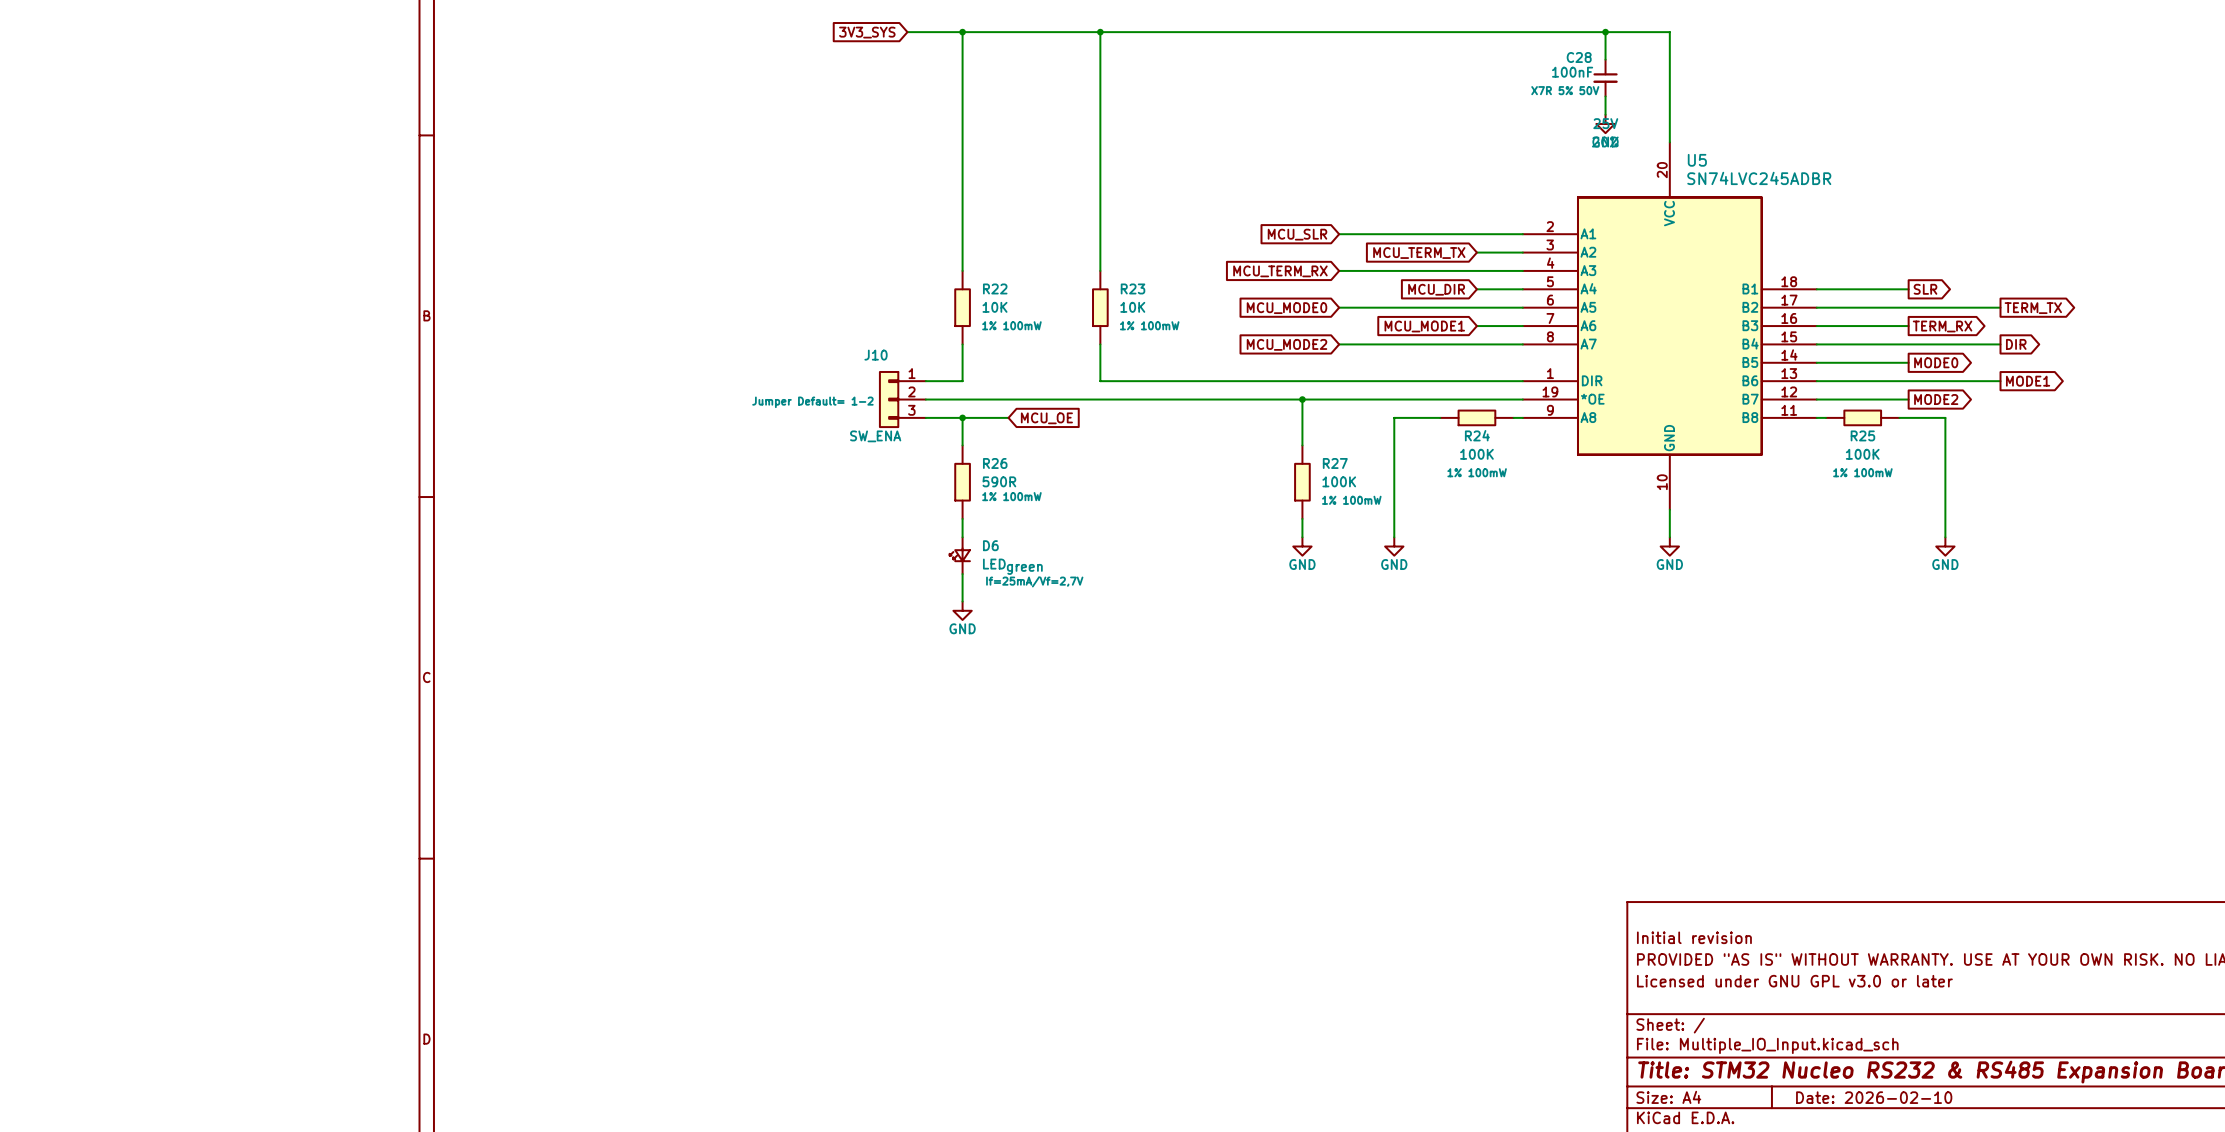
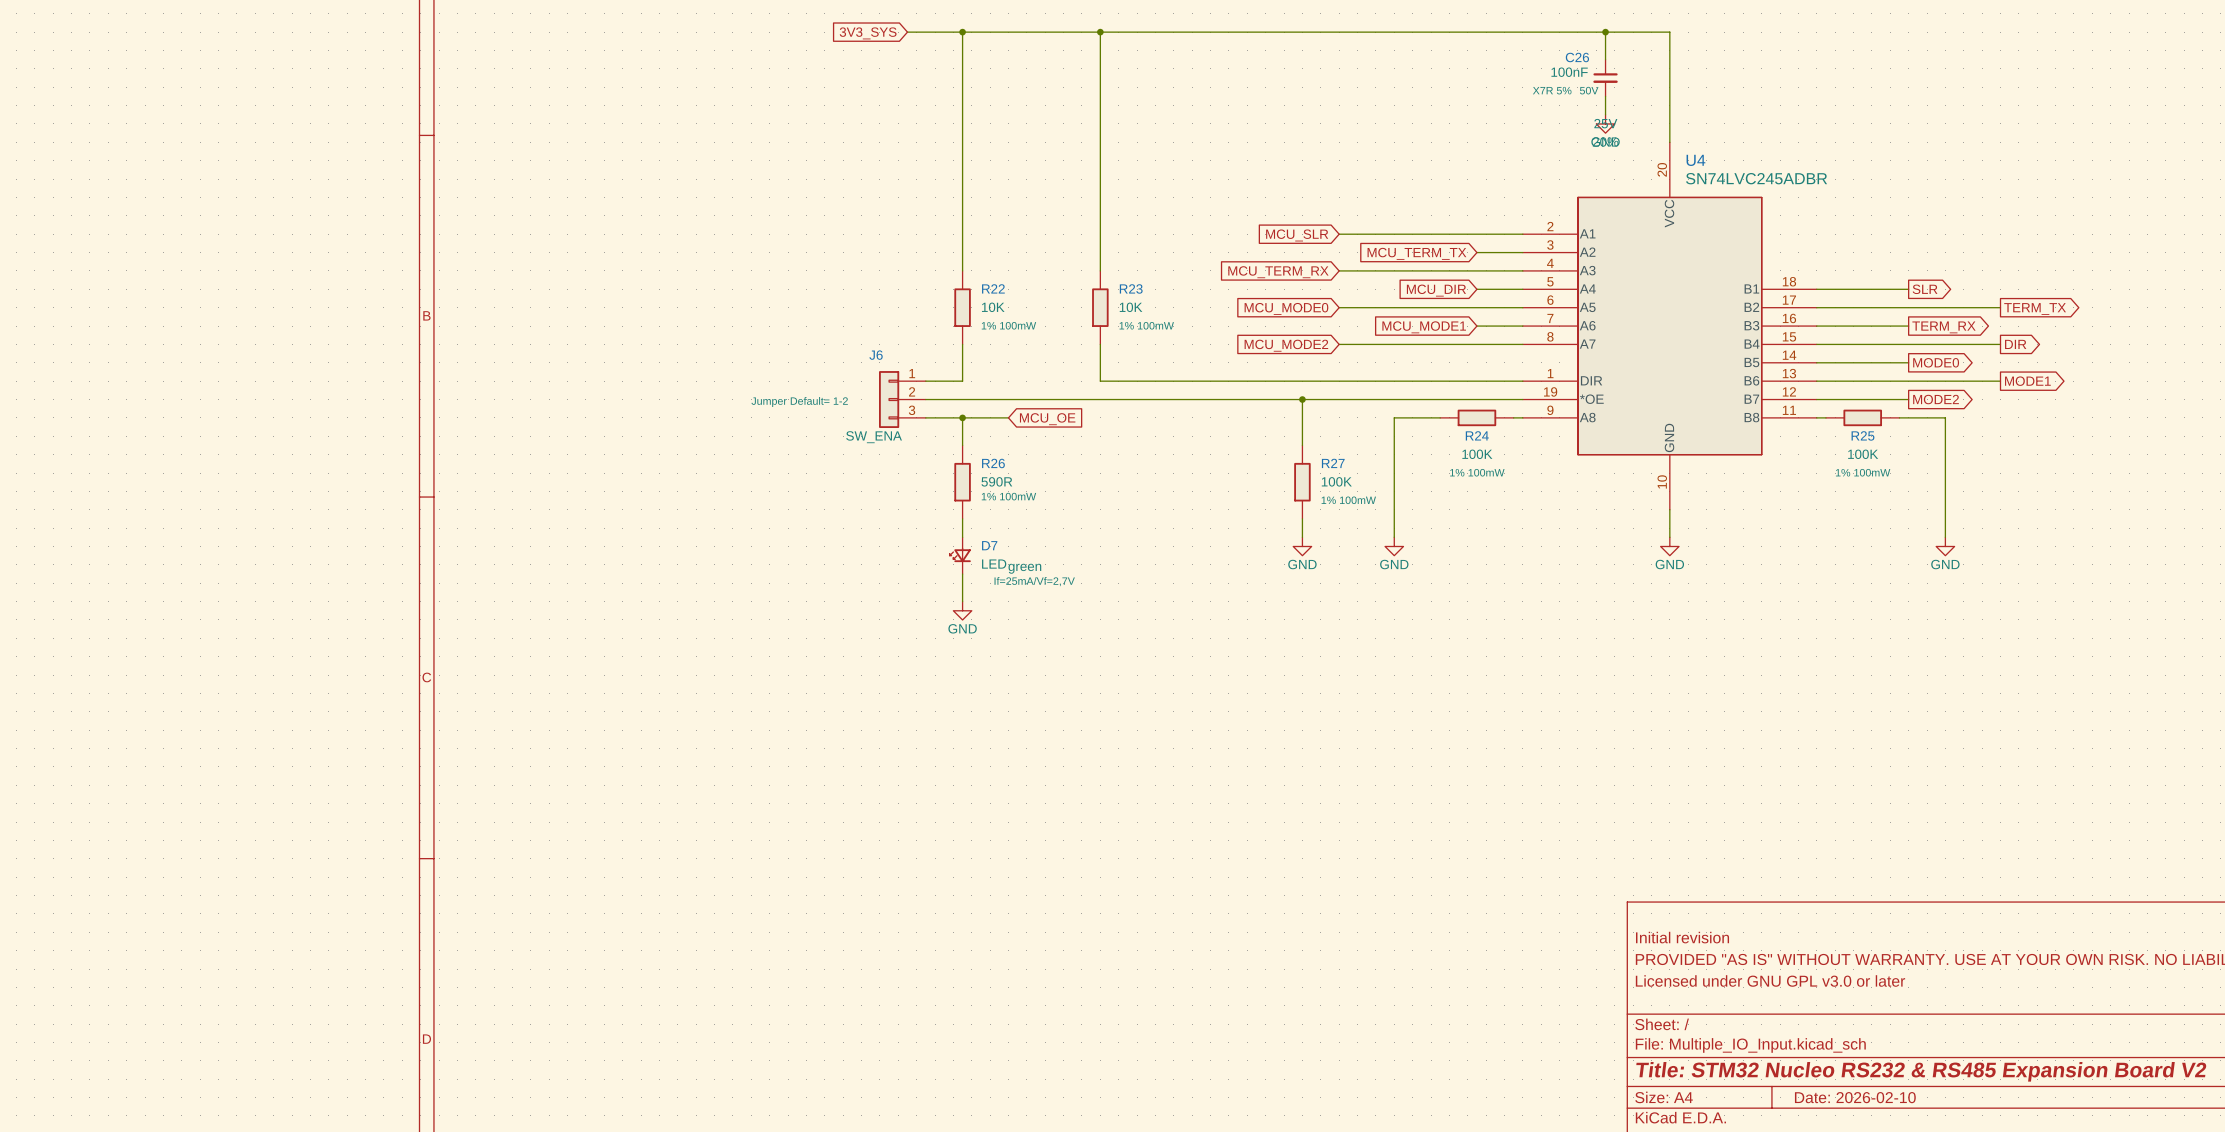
C28 name: C28 (1579, 57) -> C26 (1577, 57)
U5 name: U5 (1697, 160) -> U4 (1695, 160)
J10 name: J10 (876, 355) -> J6 (876, 355)
D6 name: D6 (990, 545) -> D7 (989, 545)

